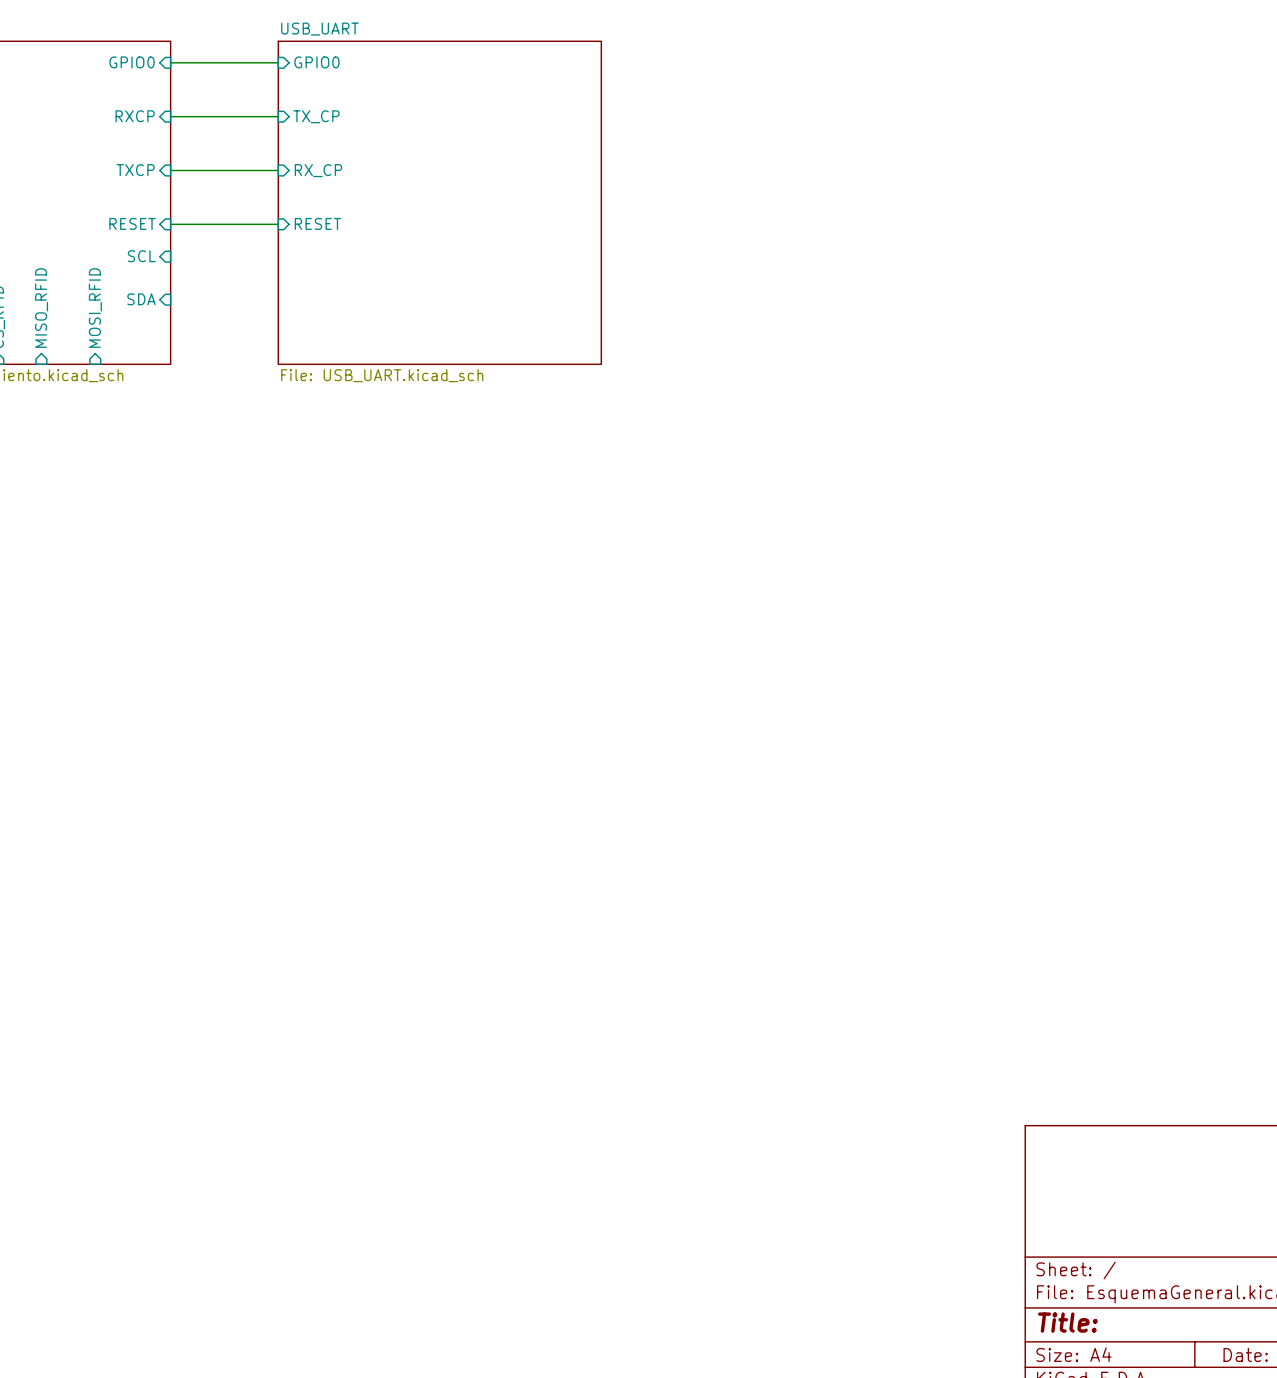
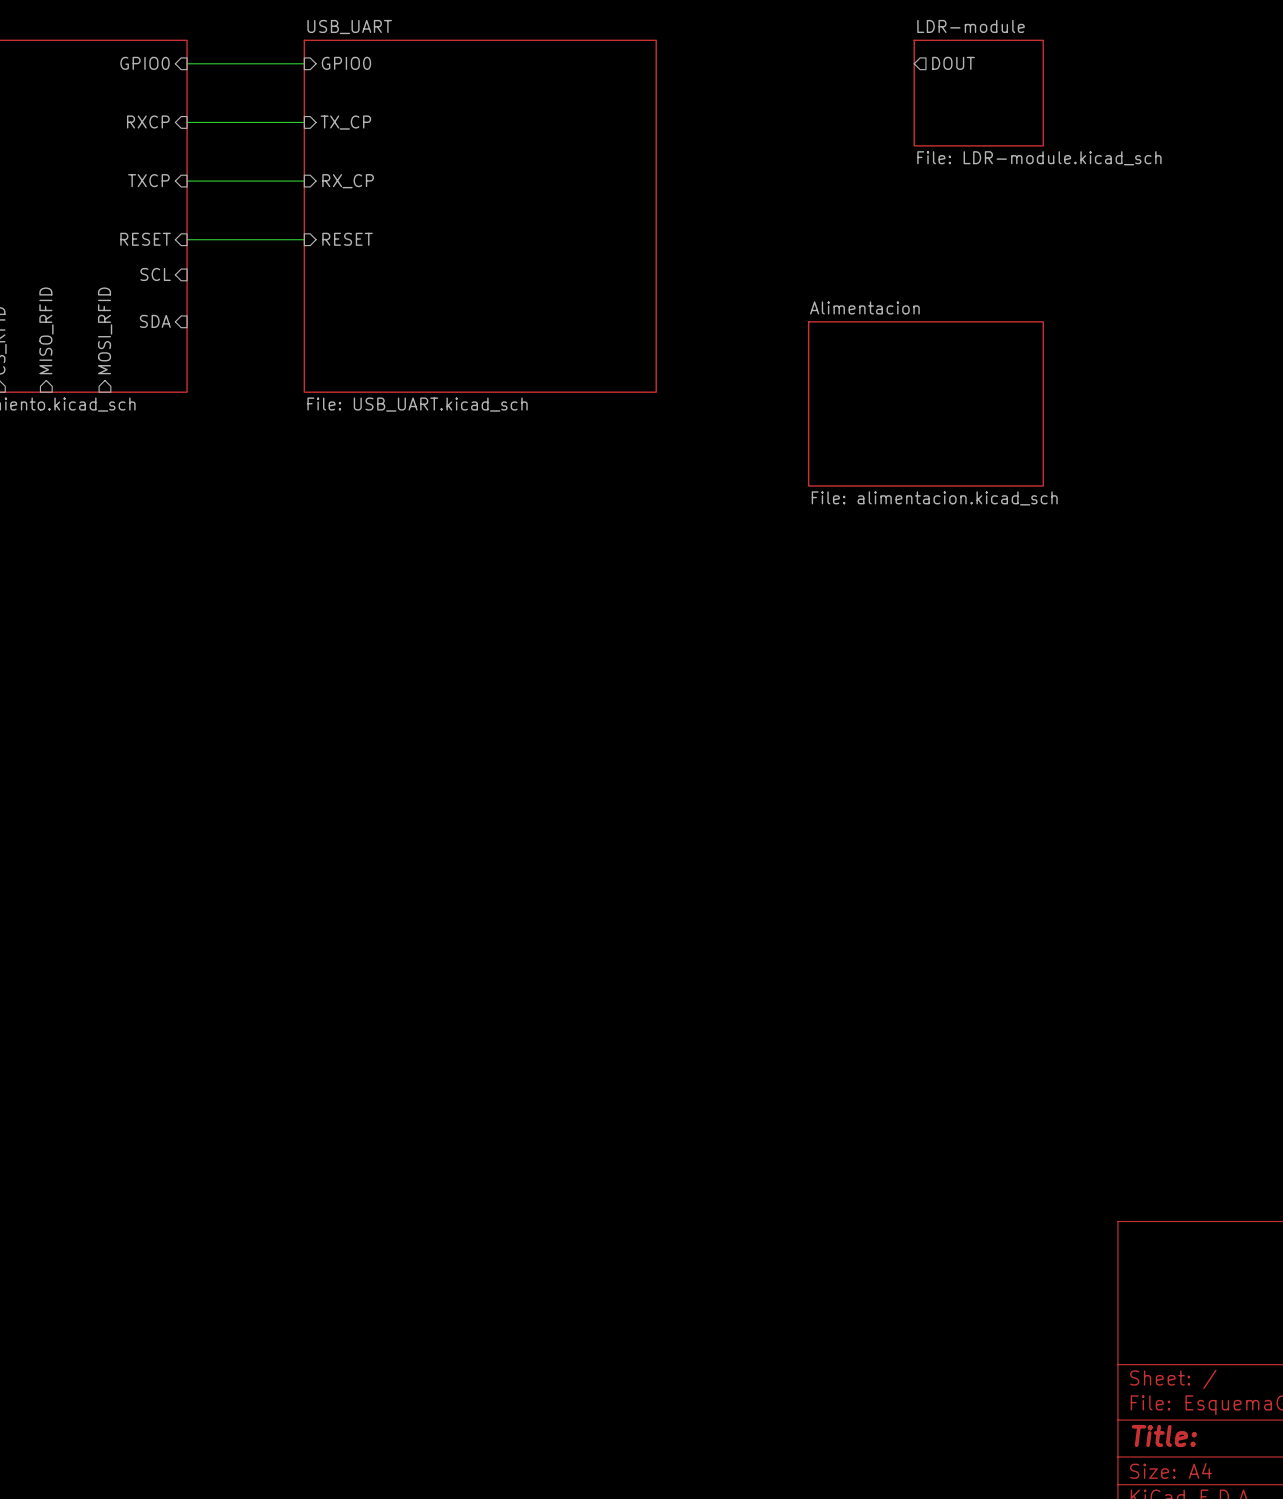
sheet pin: none -> DOUT (953, 63)
sheet LDR-module: none -> File: LDR-module.kicad_sch (978, 93)
sheet Alimentacion: none -> File: alimentacion.kicad_sch (925, 403)

